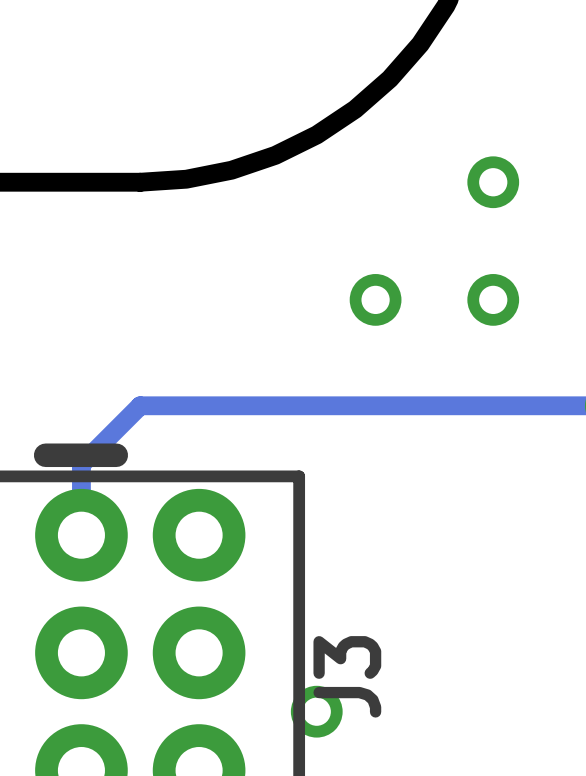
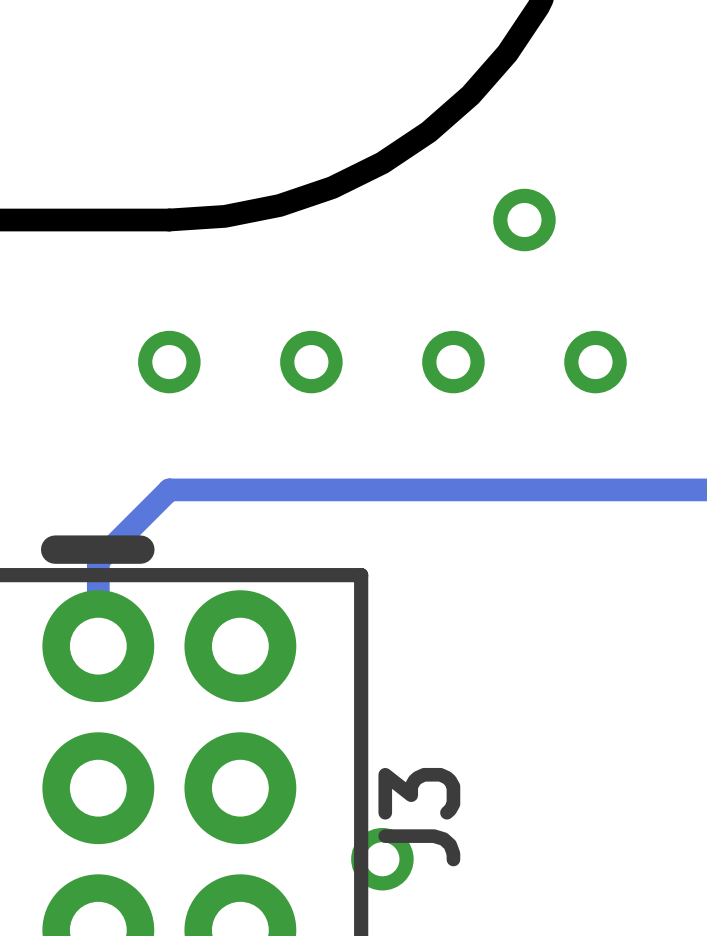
via position: (493, 182) -> (524, 220)
via: none -> (169, 362)
via: none -> (311, 362)

